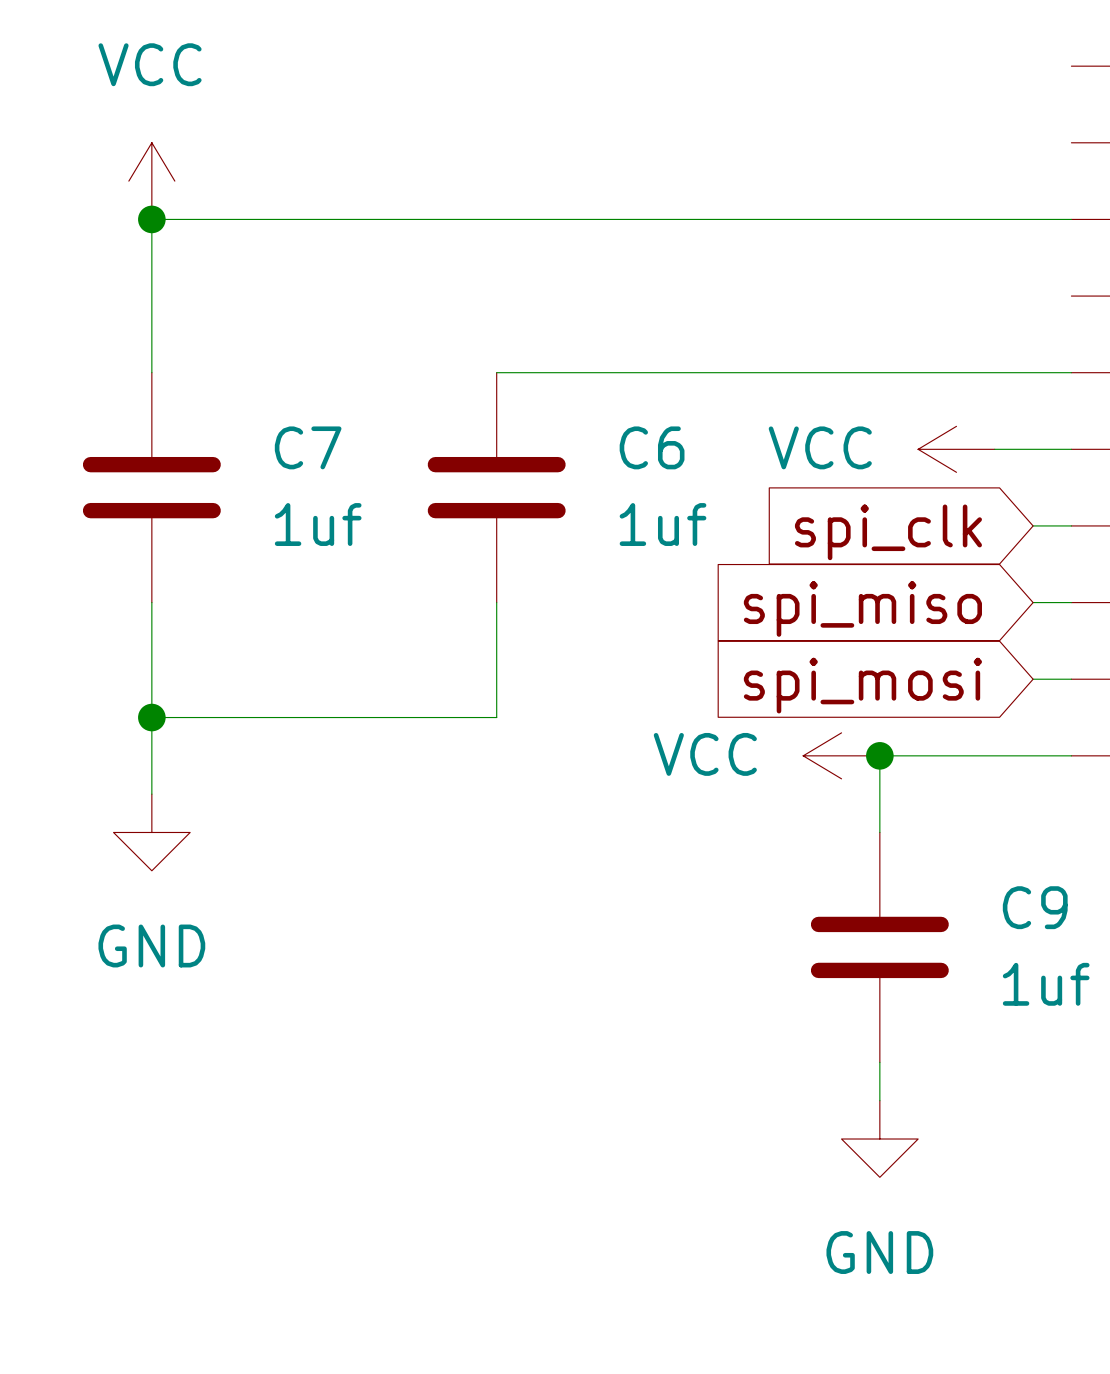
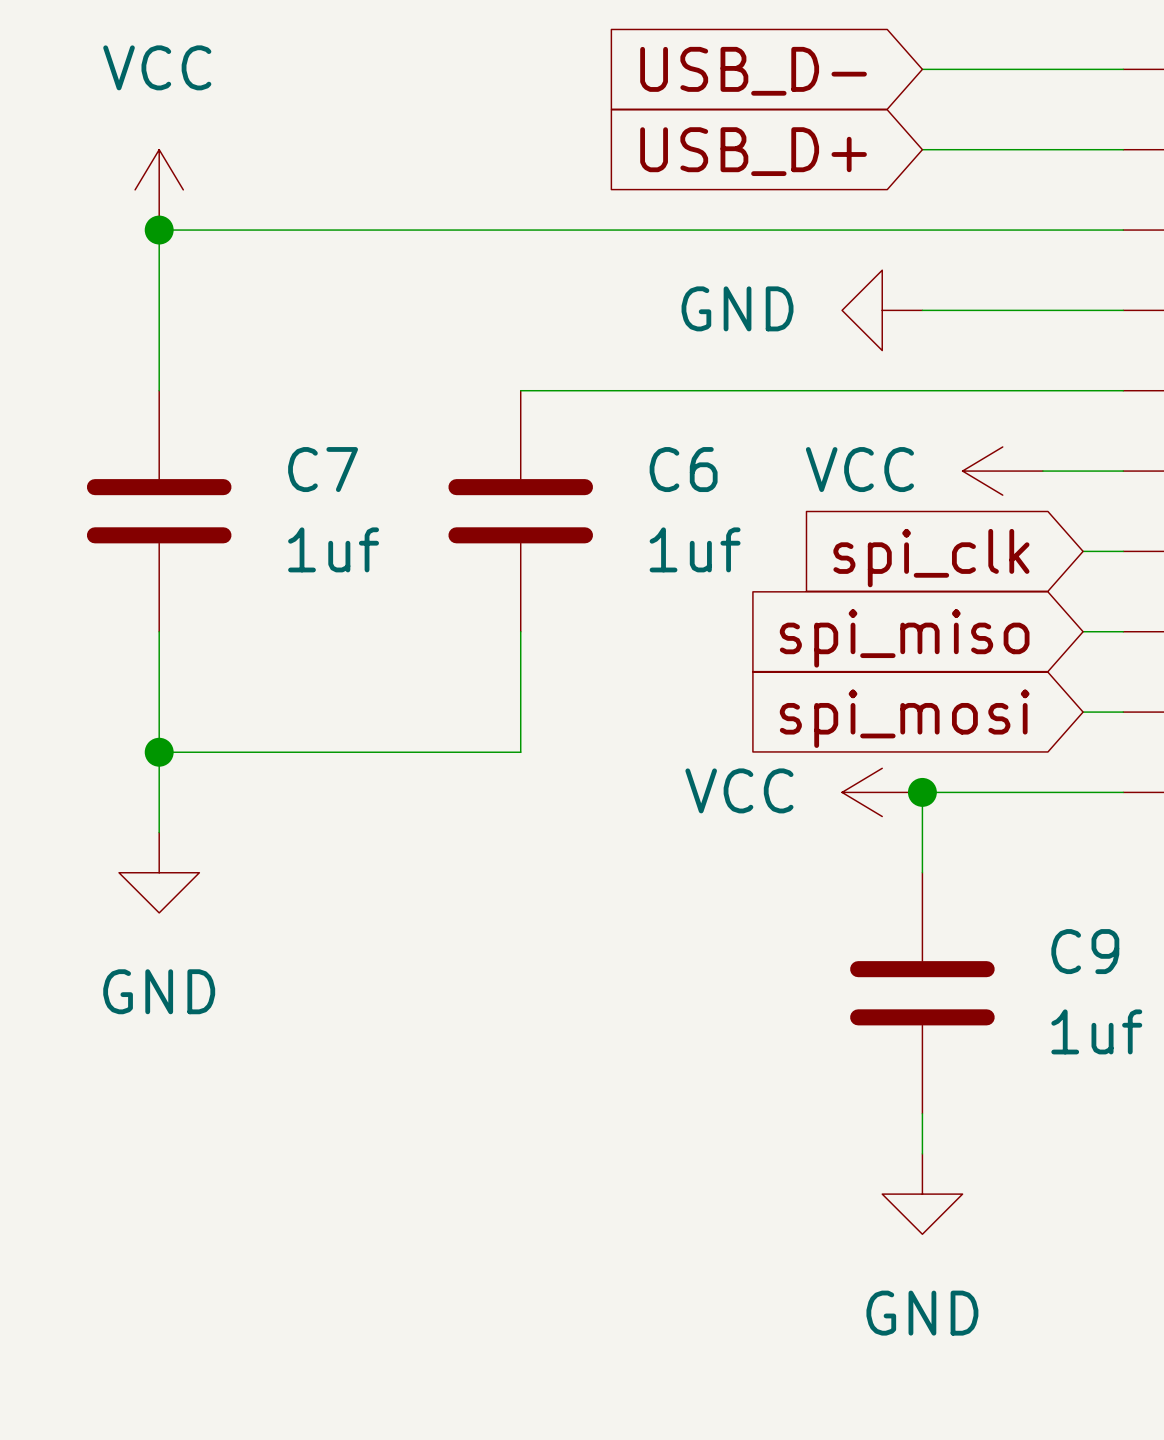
wire: none -> (922, 69) (1123, 69)
global label: none -> USB_D- (753, 71)
wire: none -> (922, 149) (1123, 149)
global label: none -> USB_D+ (753, 151)
power symbol: none -> GND (882, 310)
wire: none -> (922, 310) (1123, 310)

